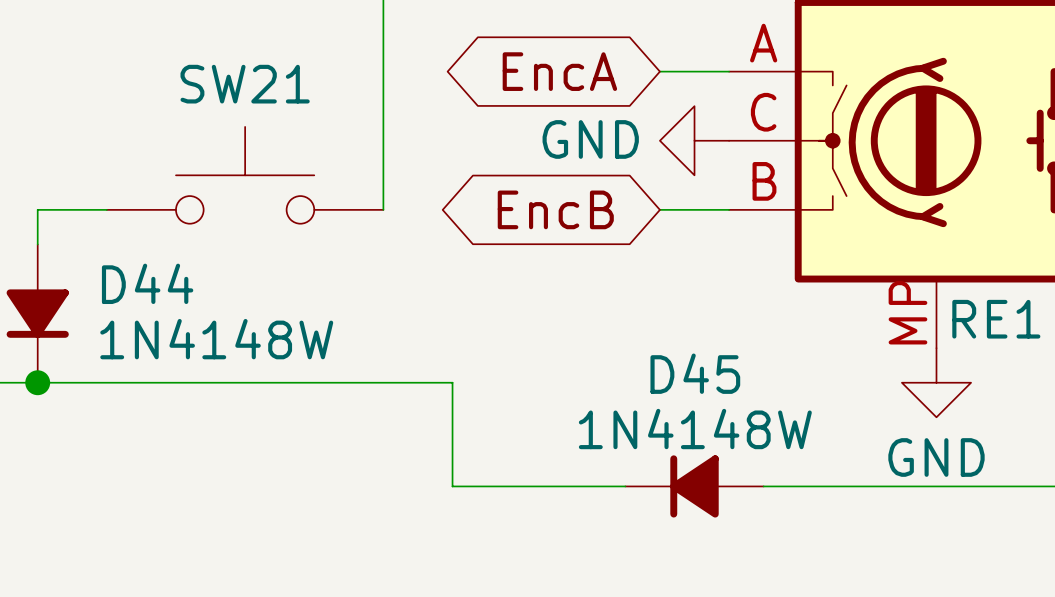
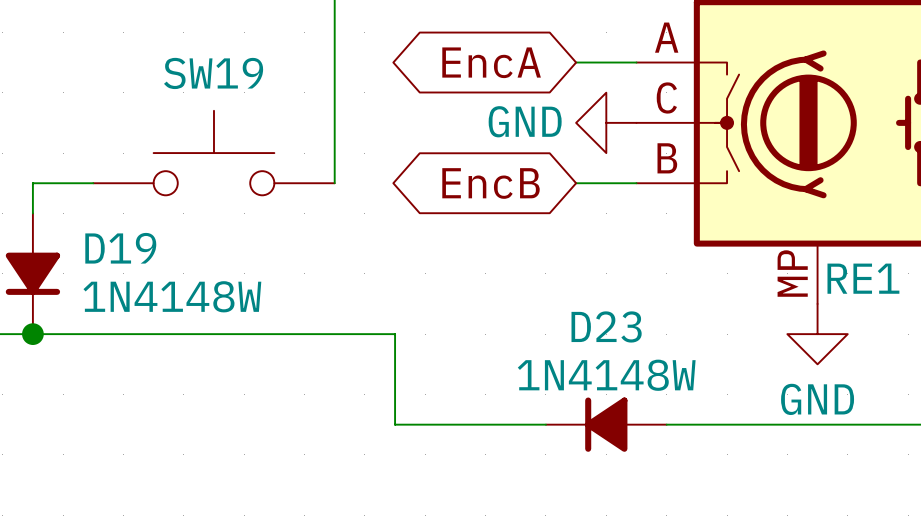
SW21 name: SW21 (245, 84) -> SW19 (213, 73)
D44 name: D44 (147, 283) -> D19 (120, 248)
D45 name: D45 (695, 373) -> D23 (606, 326)

